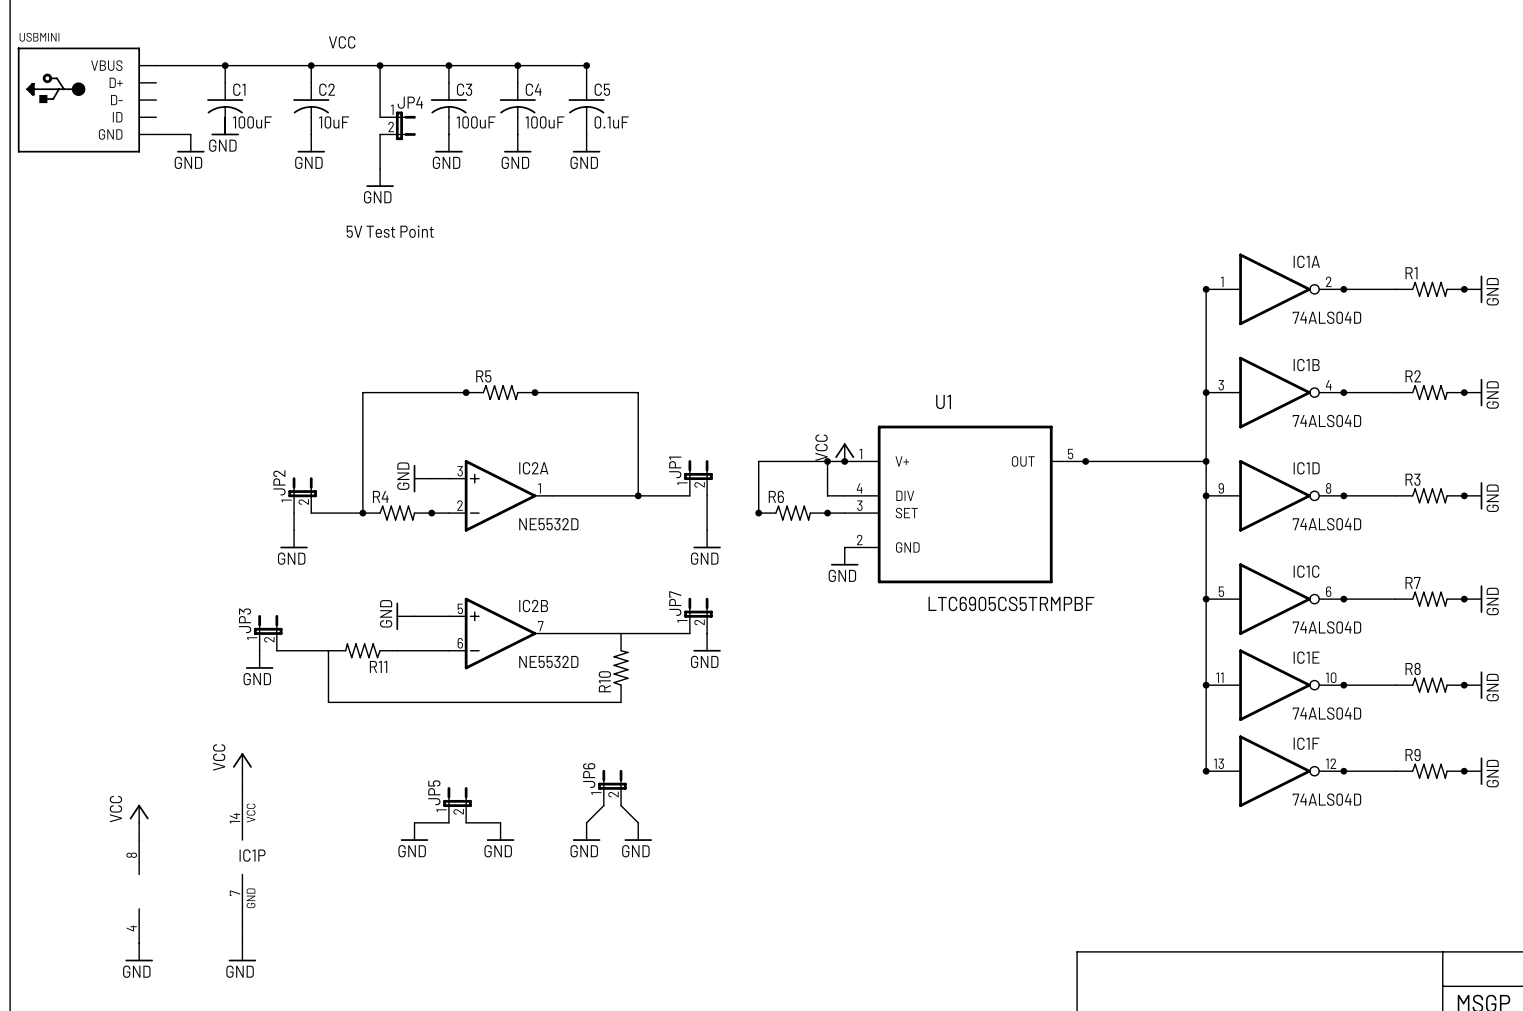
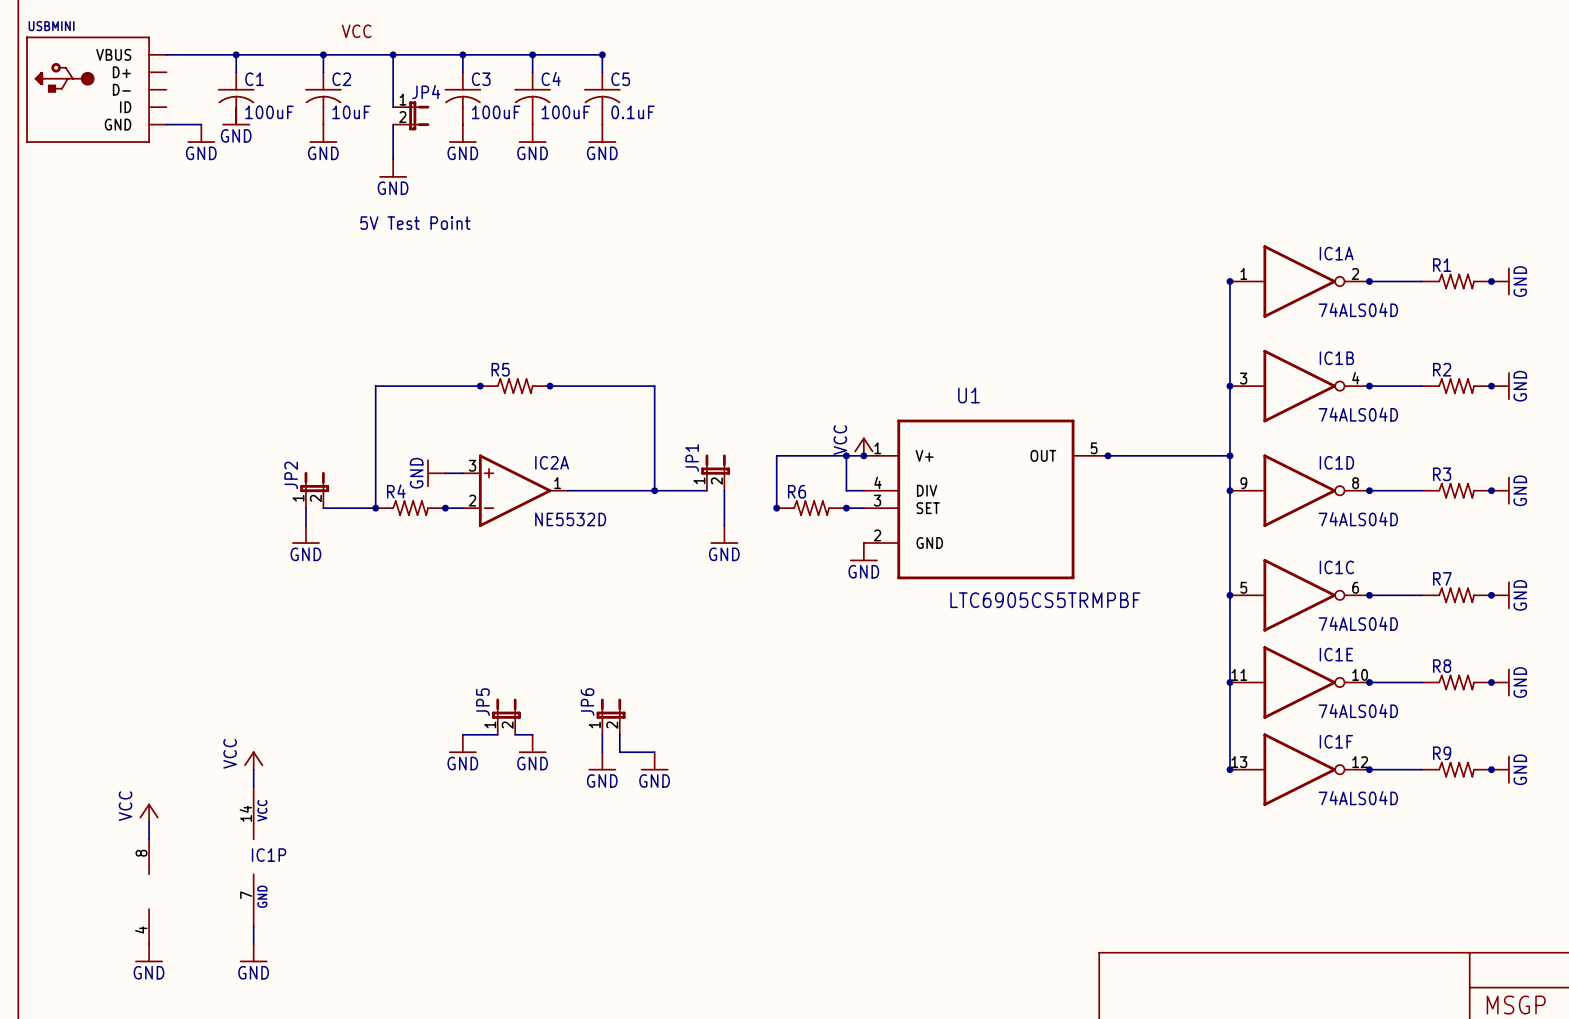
JP7: (698, 615) -> none
power symbol: GND (405, 616) -> none
wire: (414, 616) (448, 616) -> none
JP3: (268, 632) -> none
IC2B: NE5532D (500, 633) -> none
wire: (552, 633) (689, 633) -> none
power symbol: GND (707, 642) -> none
wire: (276, 650) (328, 650) (328, 702) (621, 702) -> none
R11: (362, 650) -> none
wire: (397, 650) (448, 650) -> none
power symbol: GND (259, 659) -> none
R10: (621, 667) -> none
wire: none -> (515, 734) (532, 734)
wire: none -> (602, 734) (602, 752)
wire: none -> (619, 734) (619, 752) (654, 752)
power symbol: none -> GND (462, 743)
power symbol: none -> GND (532, 743)
power symbol: none -> GND (602, 761)
power symbol: none -> GND (654, 761)
JP6 position: (612, 787) -> (611, 716)
JP5 position: (457, 804) -> (506, 716)
wire: (603, 805) (586, 822) -> none
wire: (621, 805) (638, 822) -> none
wire: (414, 822) (448, 822) -> none
wire: (466, 822) (500, 822) -> (462, 734) (497, 734)
power symbol: GND (414, 831) -> none
power symbol: GND (500, 831) -> none
power symbol: GND (586, 831) -> none
power symbol: GND (638, 831) -> none

